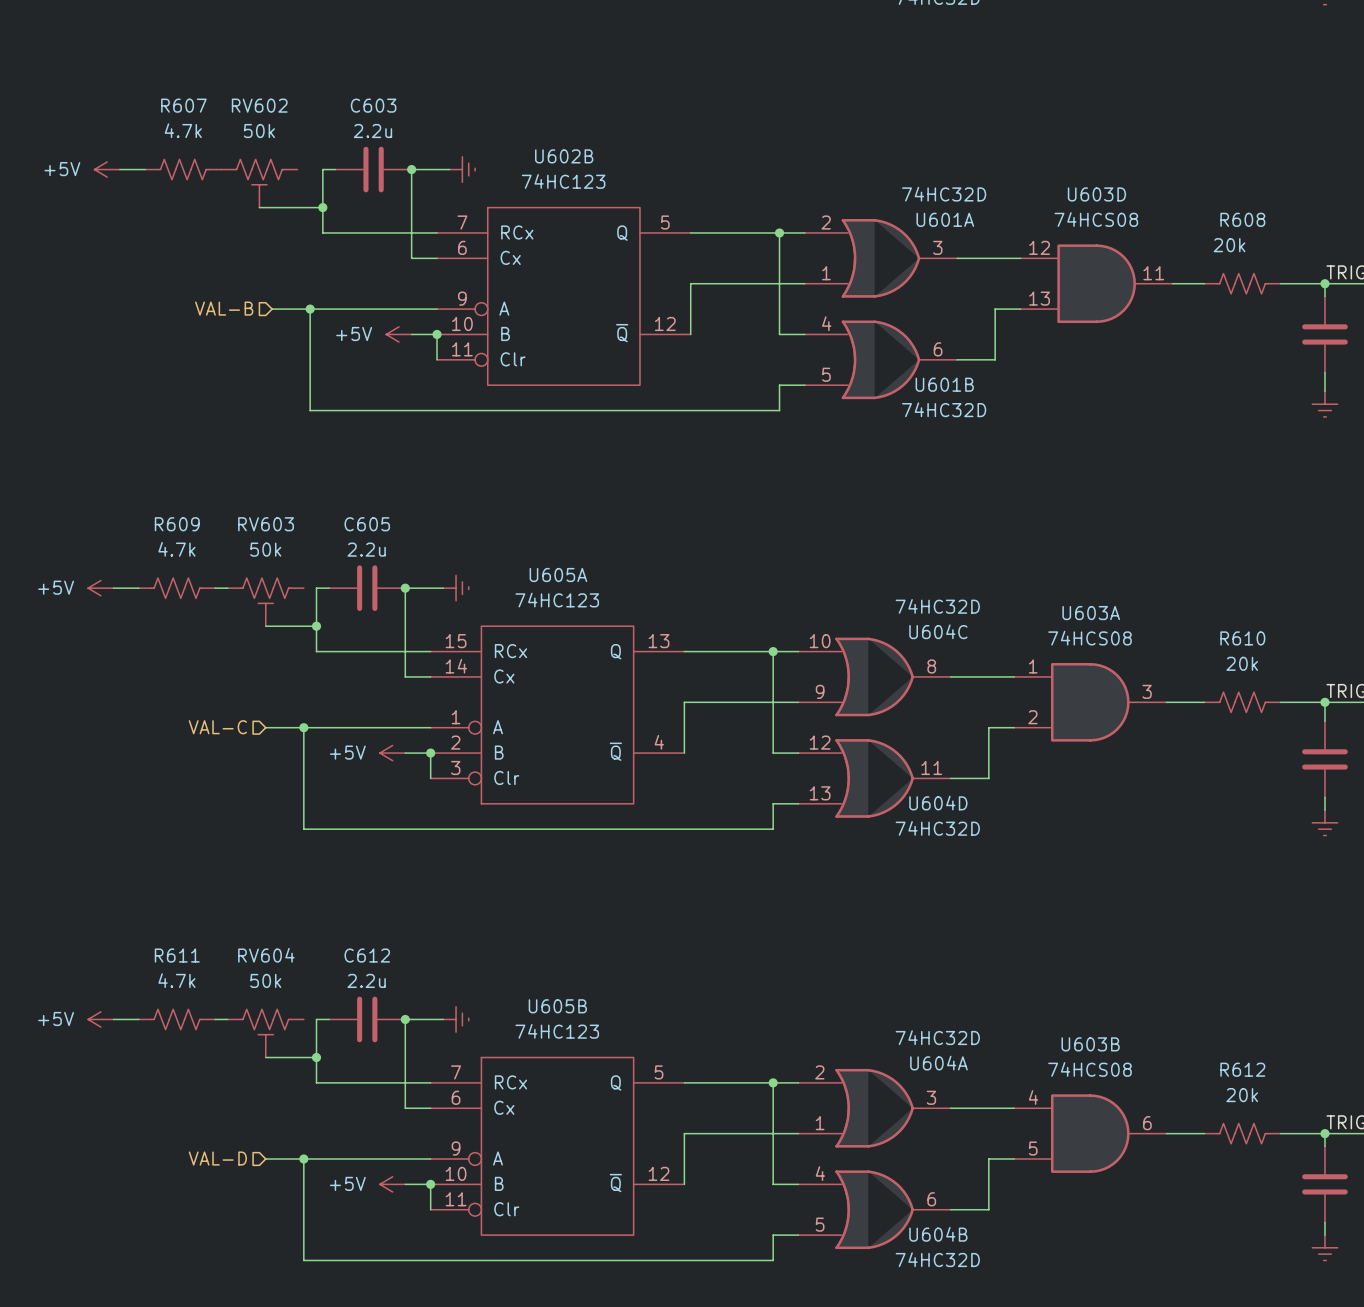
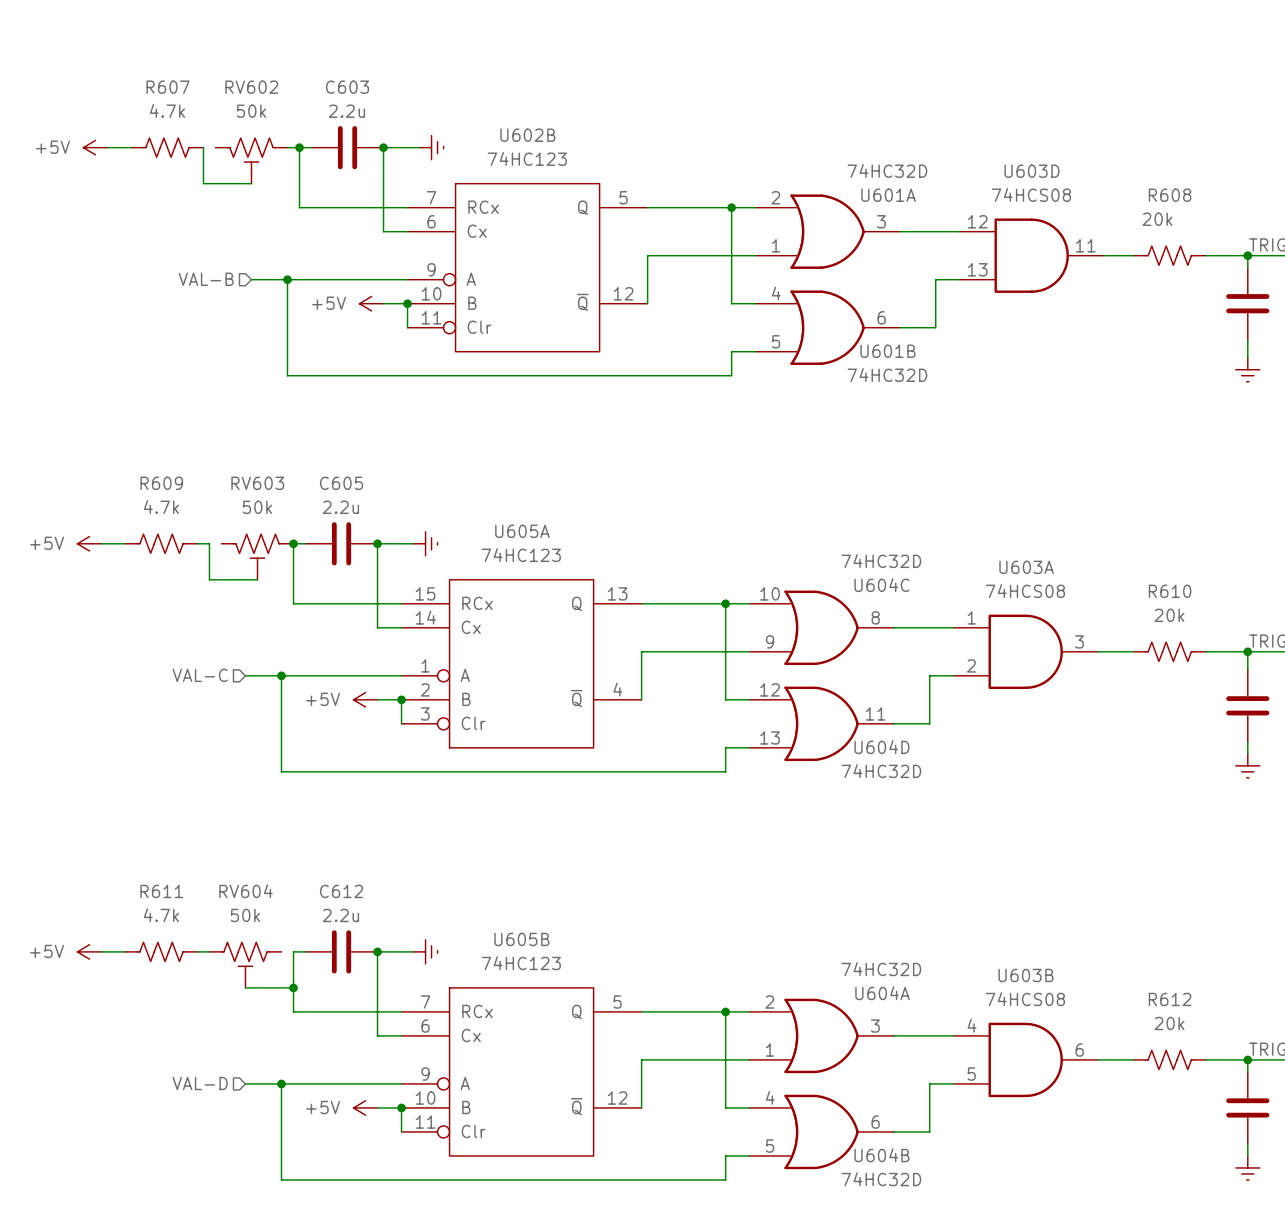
wire: none -> (203, 147) (203, 183) (239, 183)
wire: none -> (287, 147) (299, 147)
RV602 flip: as is (259, 177) -> left-right (251, 154)
wire: (272, 207) (322, 207) -> none
junction position: (322, 207) -> (299, 147)
wire: none -> (209, 543) (209, 579) (245, 579)
RV603 flip: as is (265, 595) -> left-right (257, 550)
wire: (278, 626) (316, 626) -> none
junction position: (316, 626) -> (293, 543)

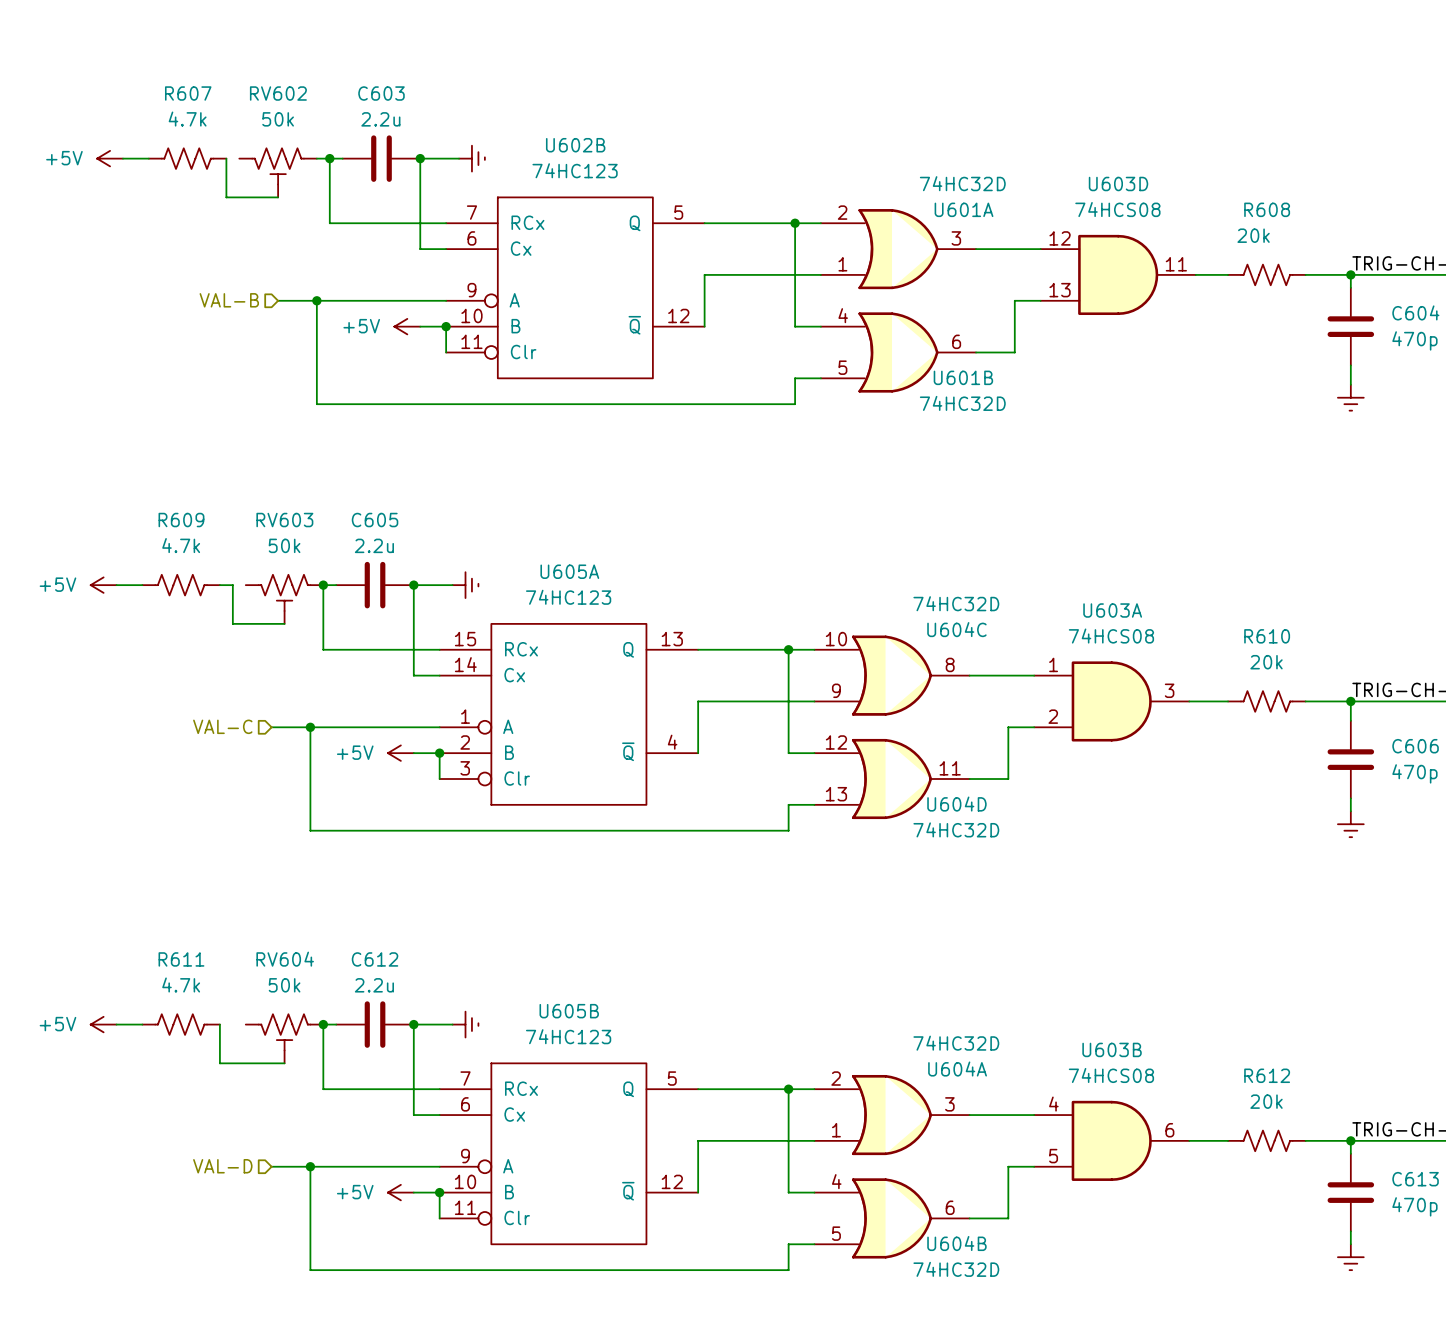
wire: (197, 951) (209, 951) -> (219, 1024) (219, 1063) (271, 1063)
RV604 flip: as is (245, 959) -> left-right (284, 1032)
wire: (257, 987) (293, 987) -> none
junction position: (293, 987) -> (323, 1024)

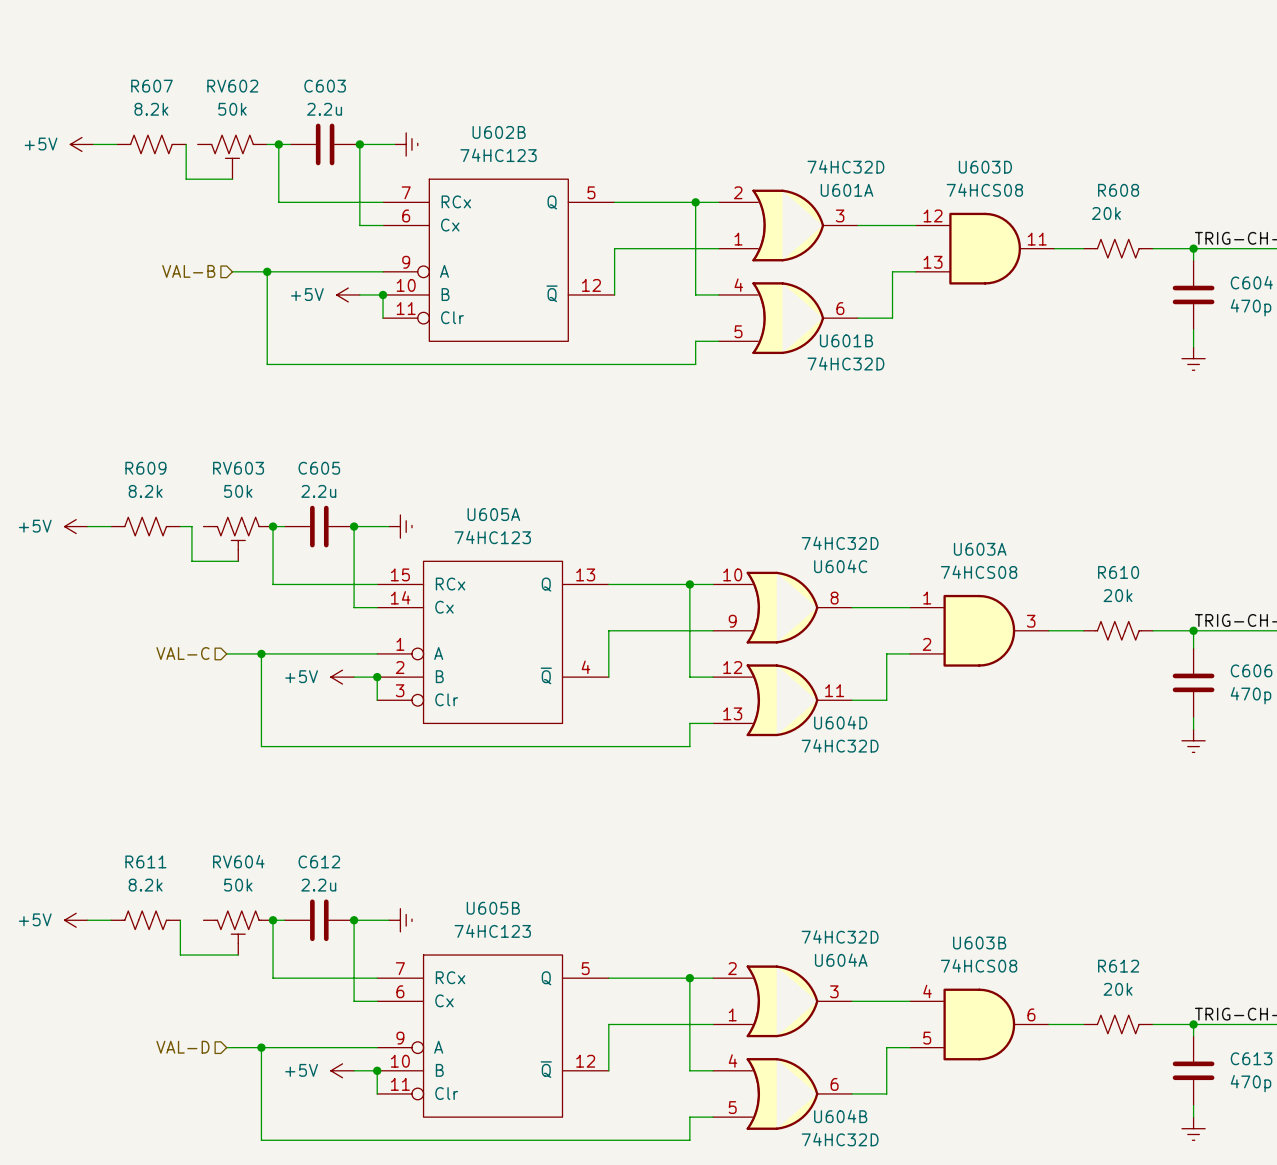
R607 value: 4.7k (187, 119) -> 8.2k (151, 109)
R609 value: 4.7k (181, 545) -> 8.2k (145, 491)
R611 value: 4.7k (181, 985) -> 8.2k (145, 885)

